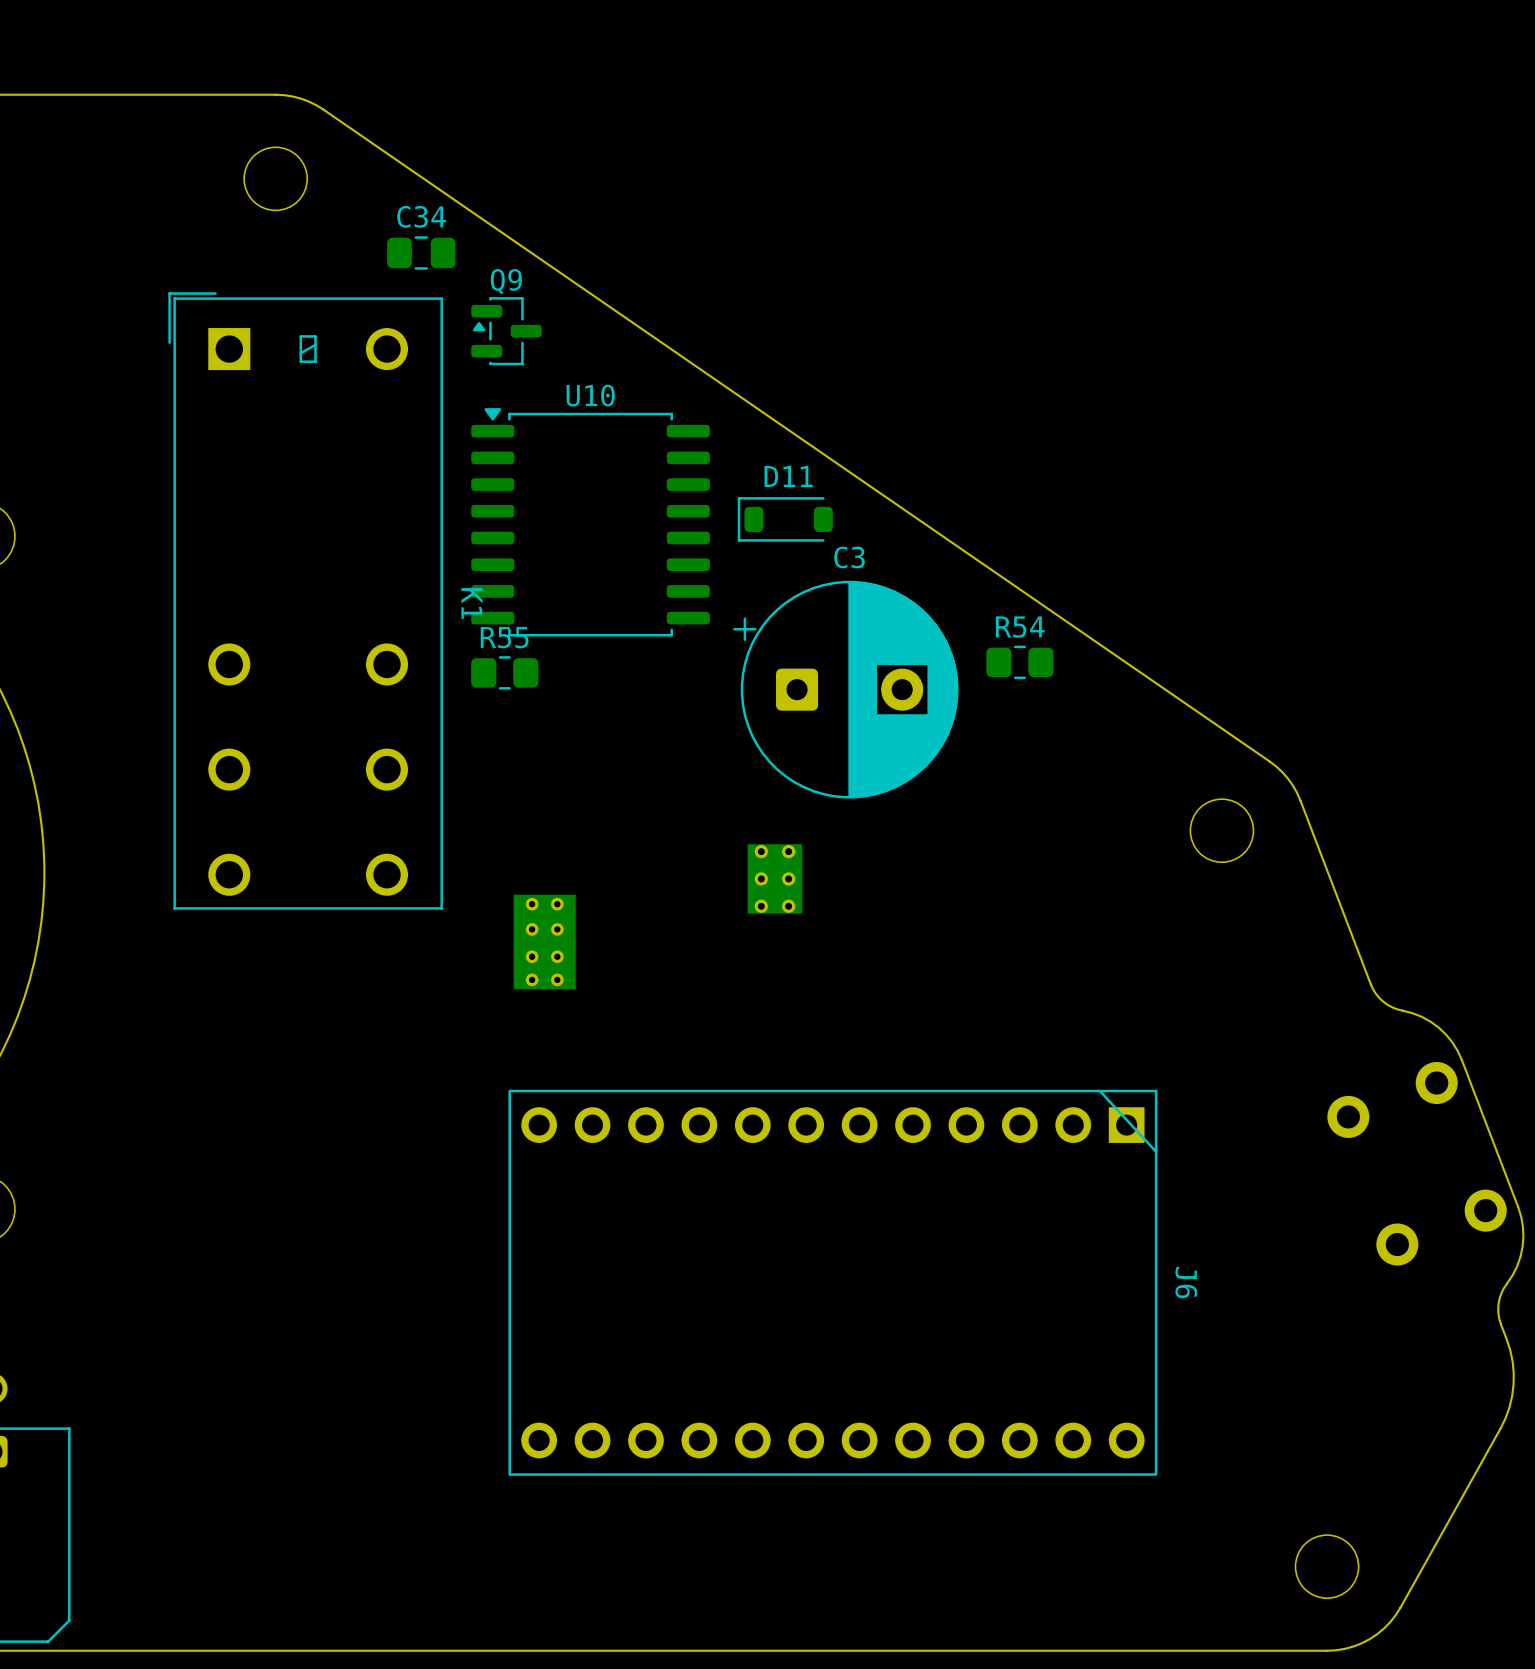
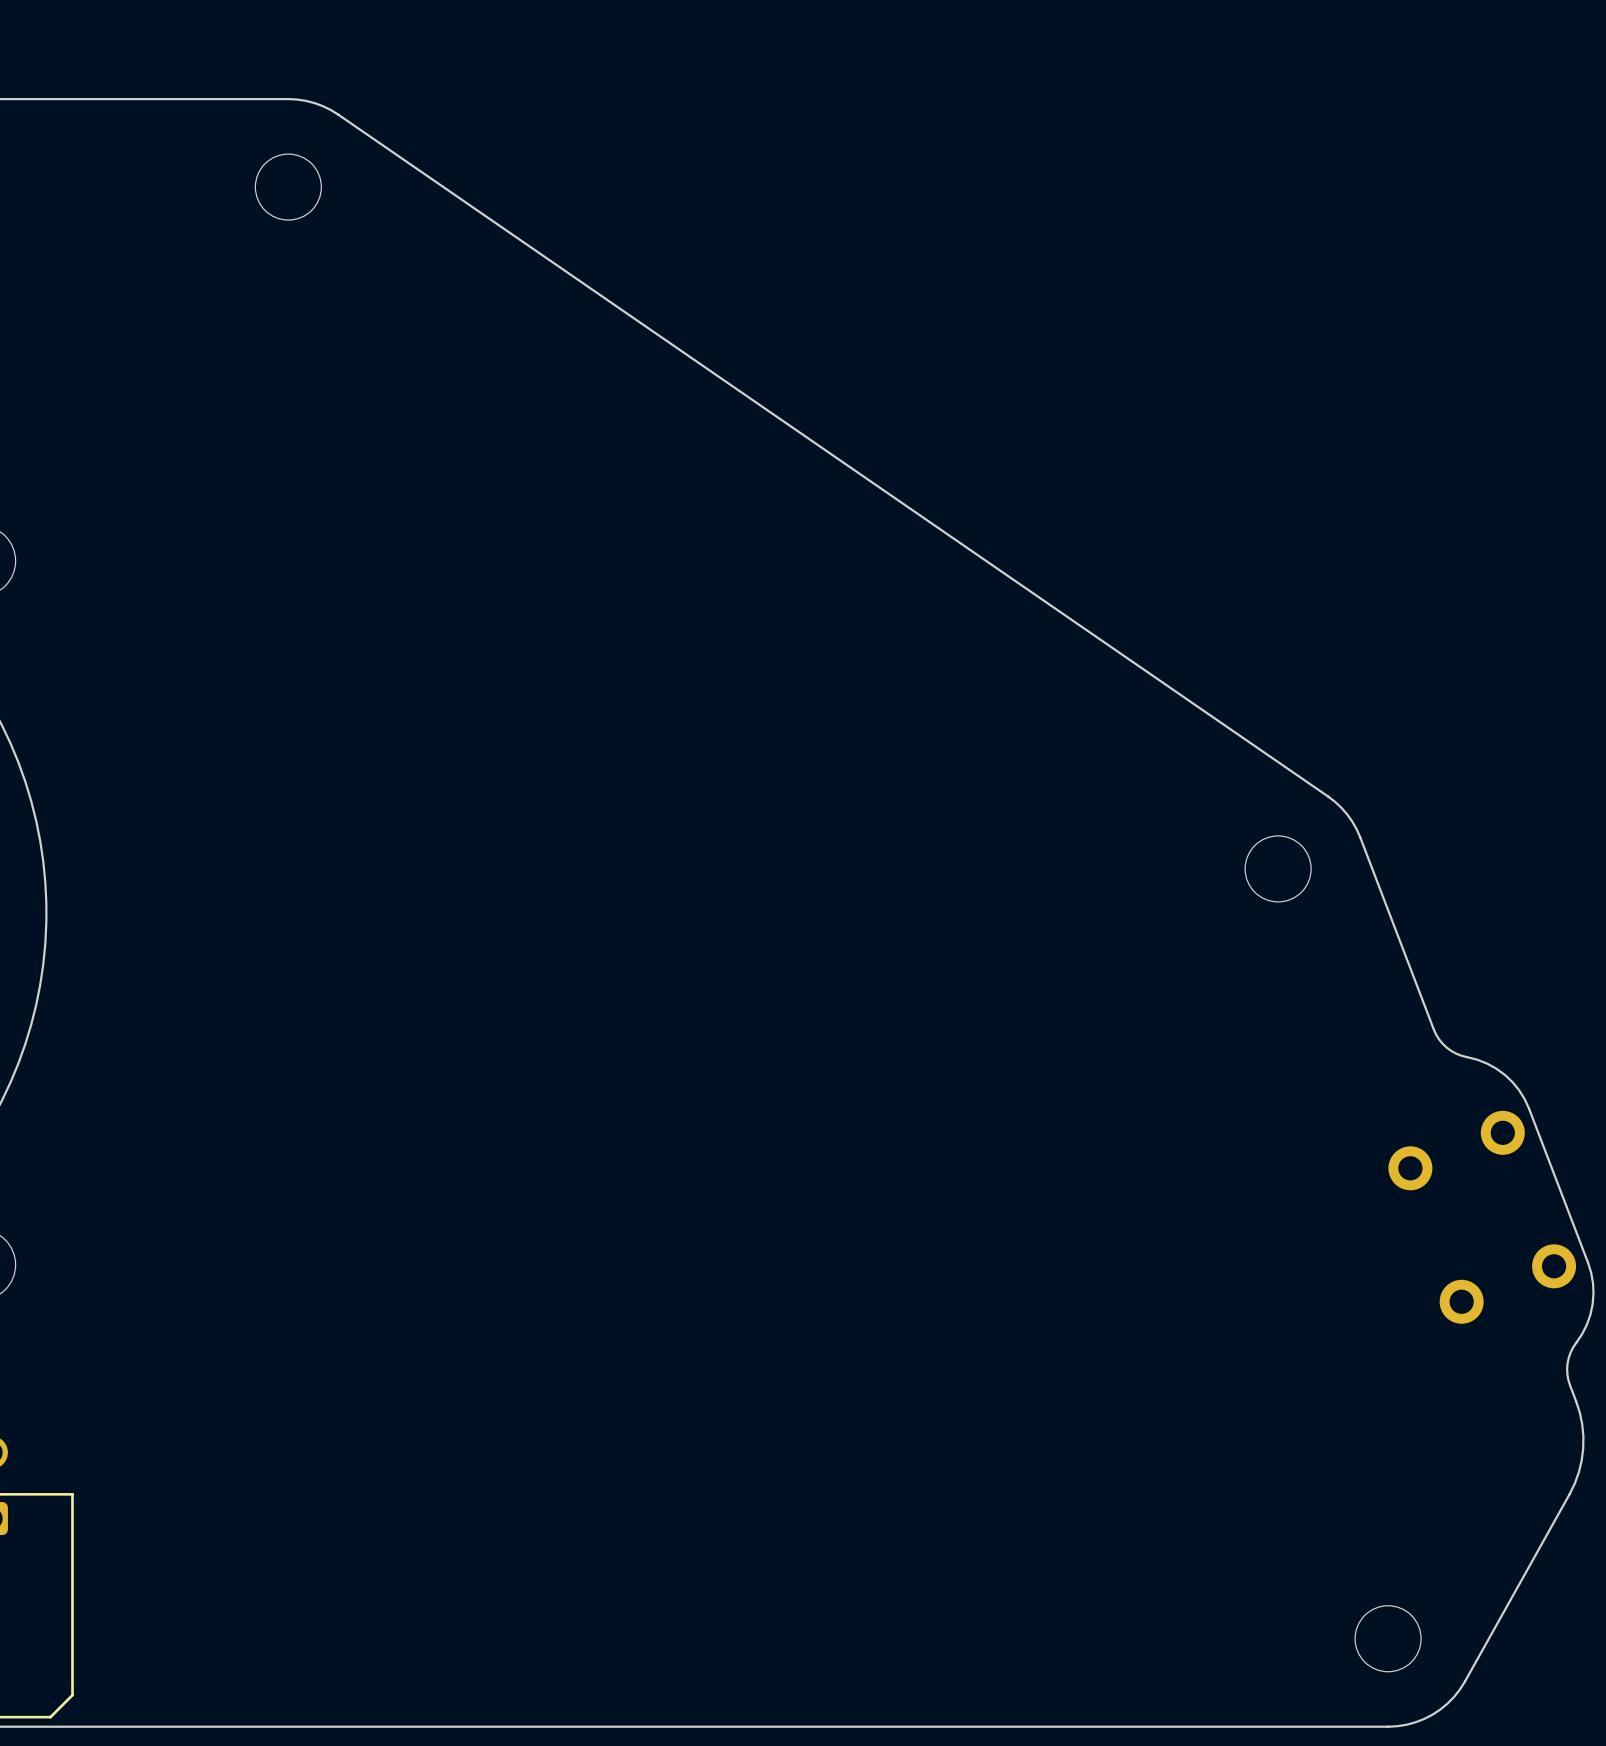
C34: (421, 252) -> none
Q9: (506, 331) -> none
D11: (785, 519) -> none
U10: (590, 522) -> none
K1: (305, 600) -> none
R54: (1019, 662) -> none
R55: (504, 672) -> none
C3: (845, 689) -> none
part: (774, 878) -> none
part: (544, 942) -> none
J6: (832, 1282) -> none

